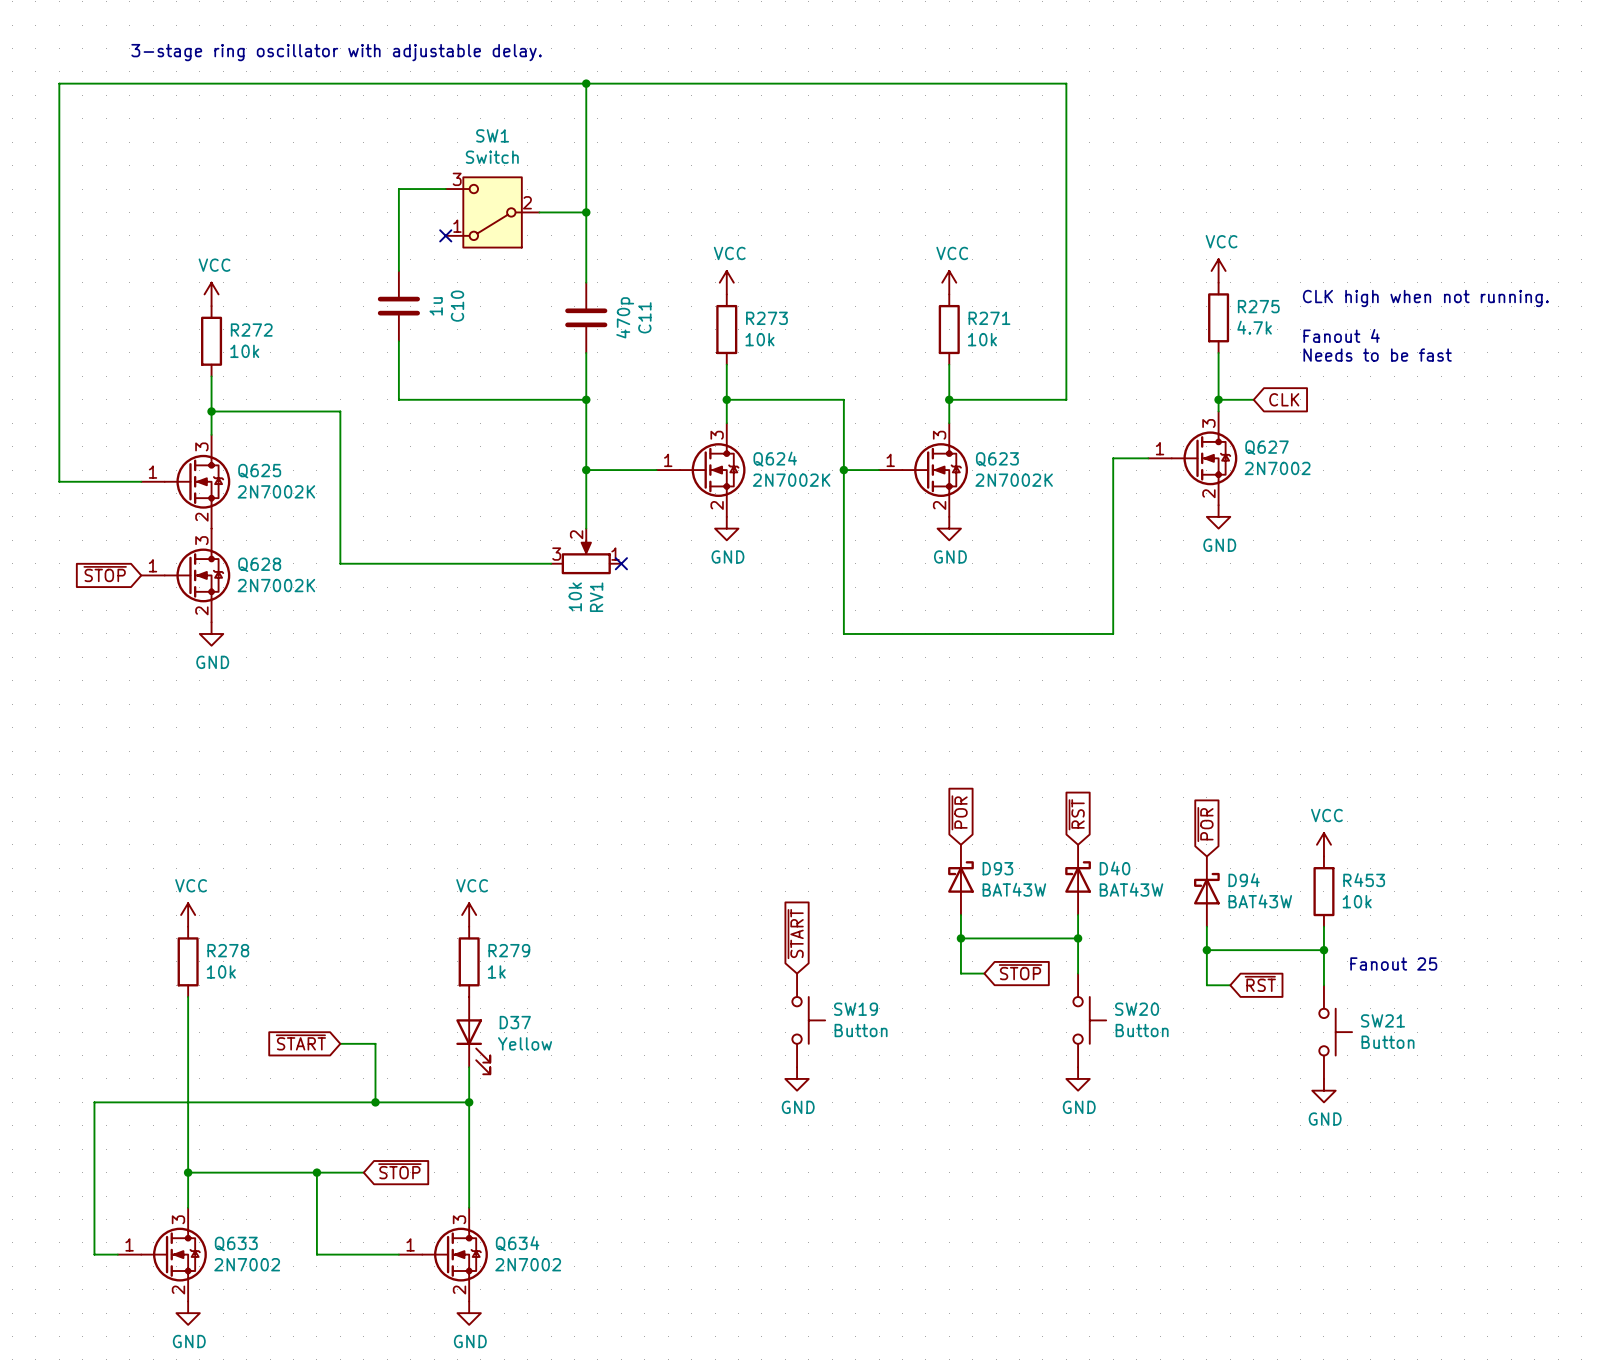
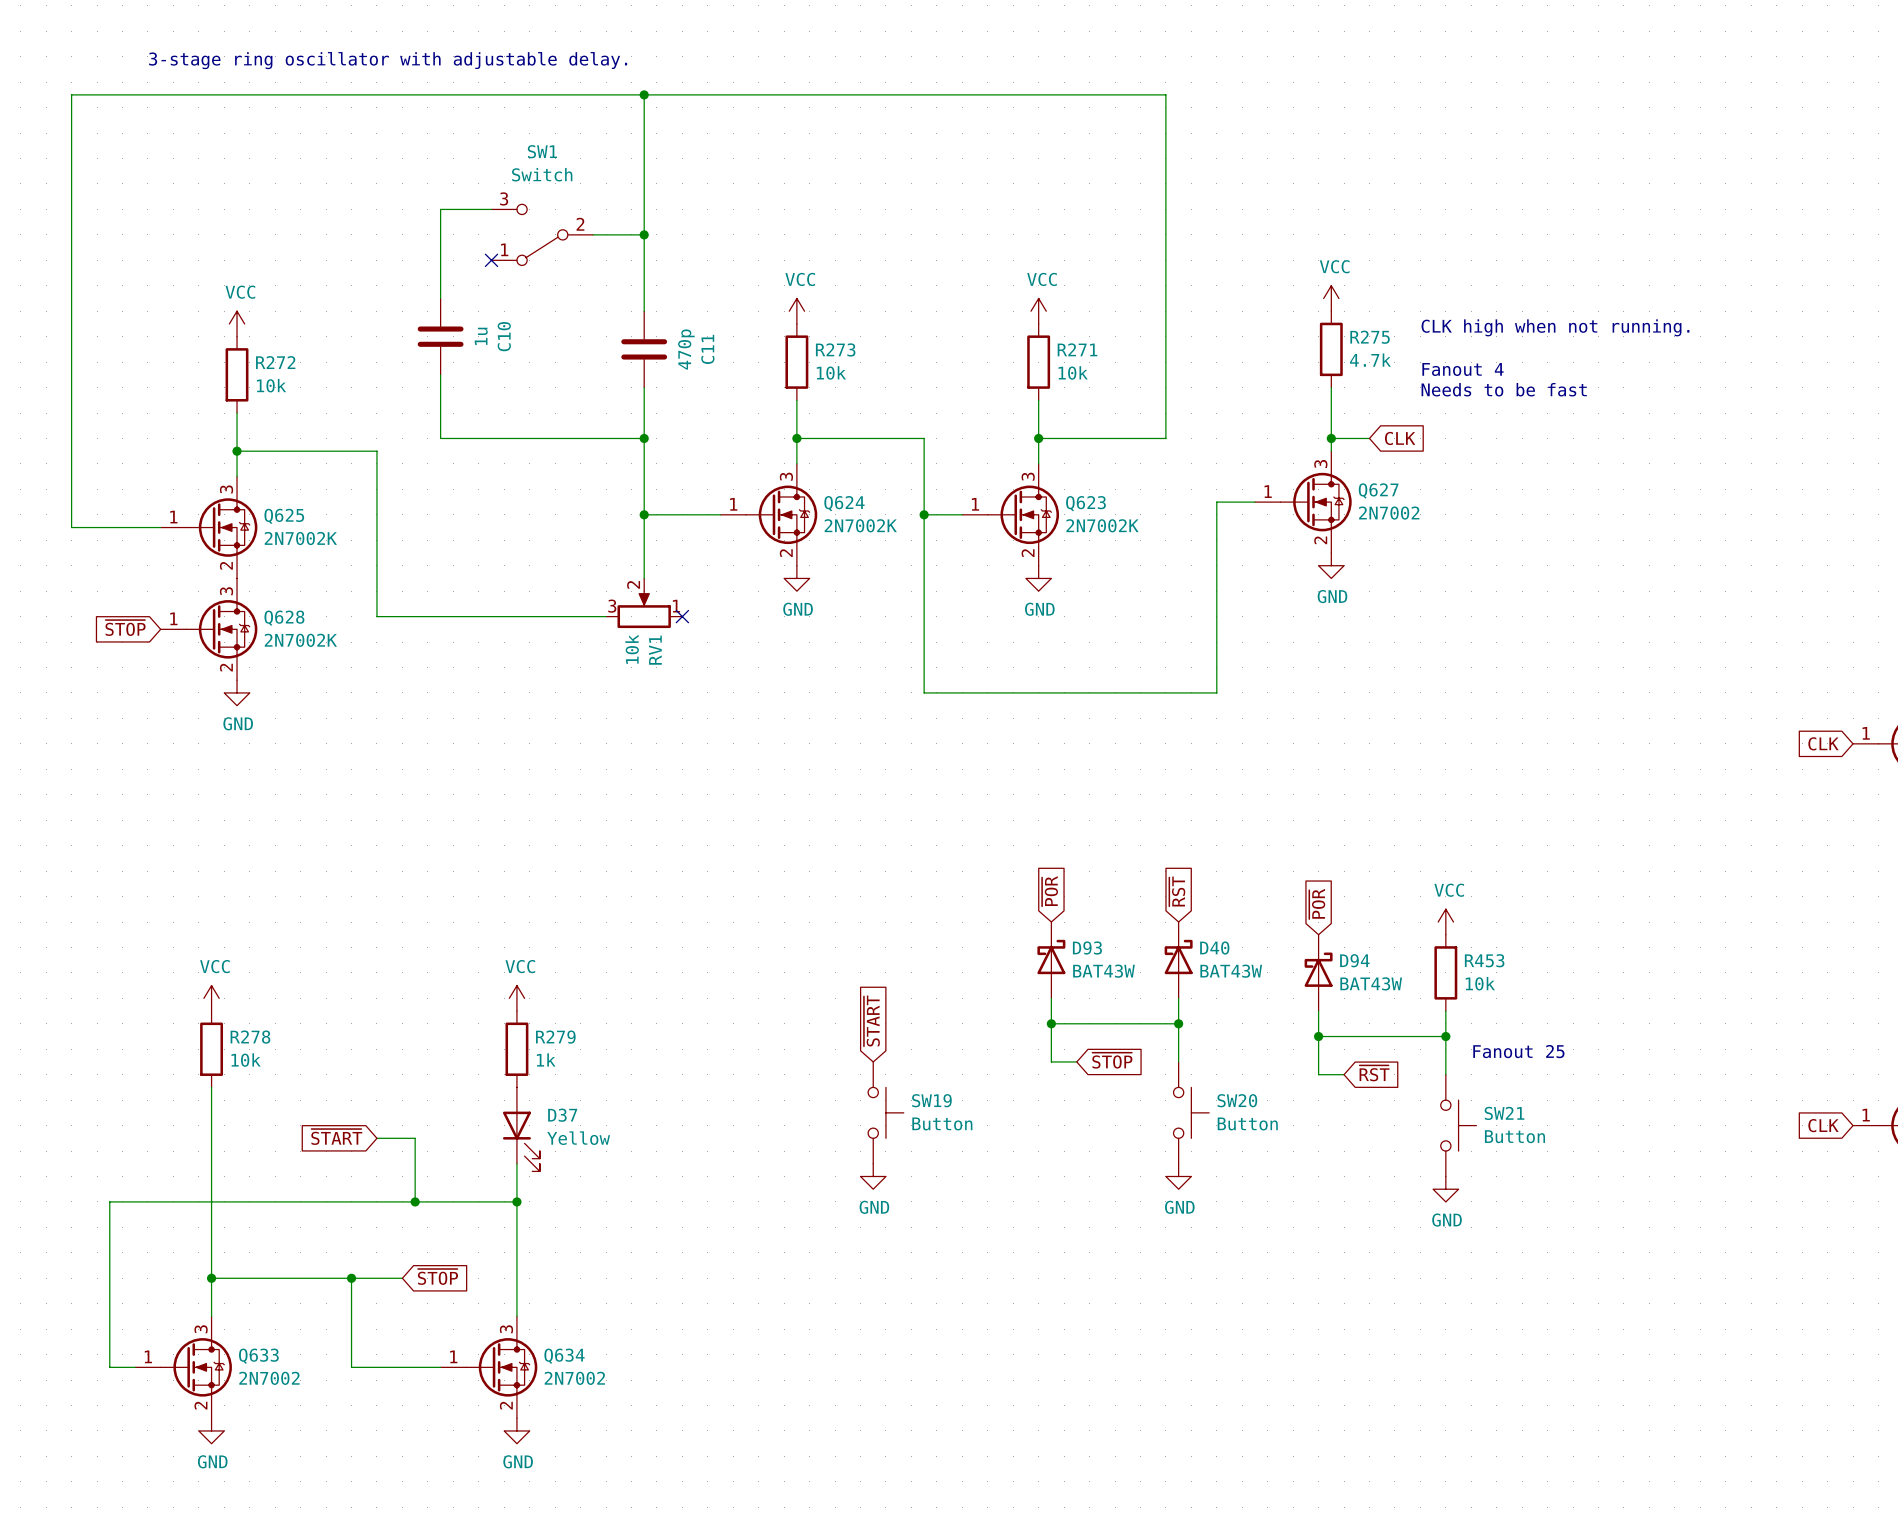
SW1 symbol: [445, 177, 540, 248] -> [491, 204, 594, 266]

